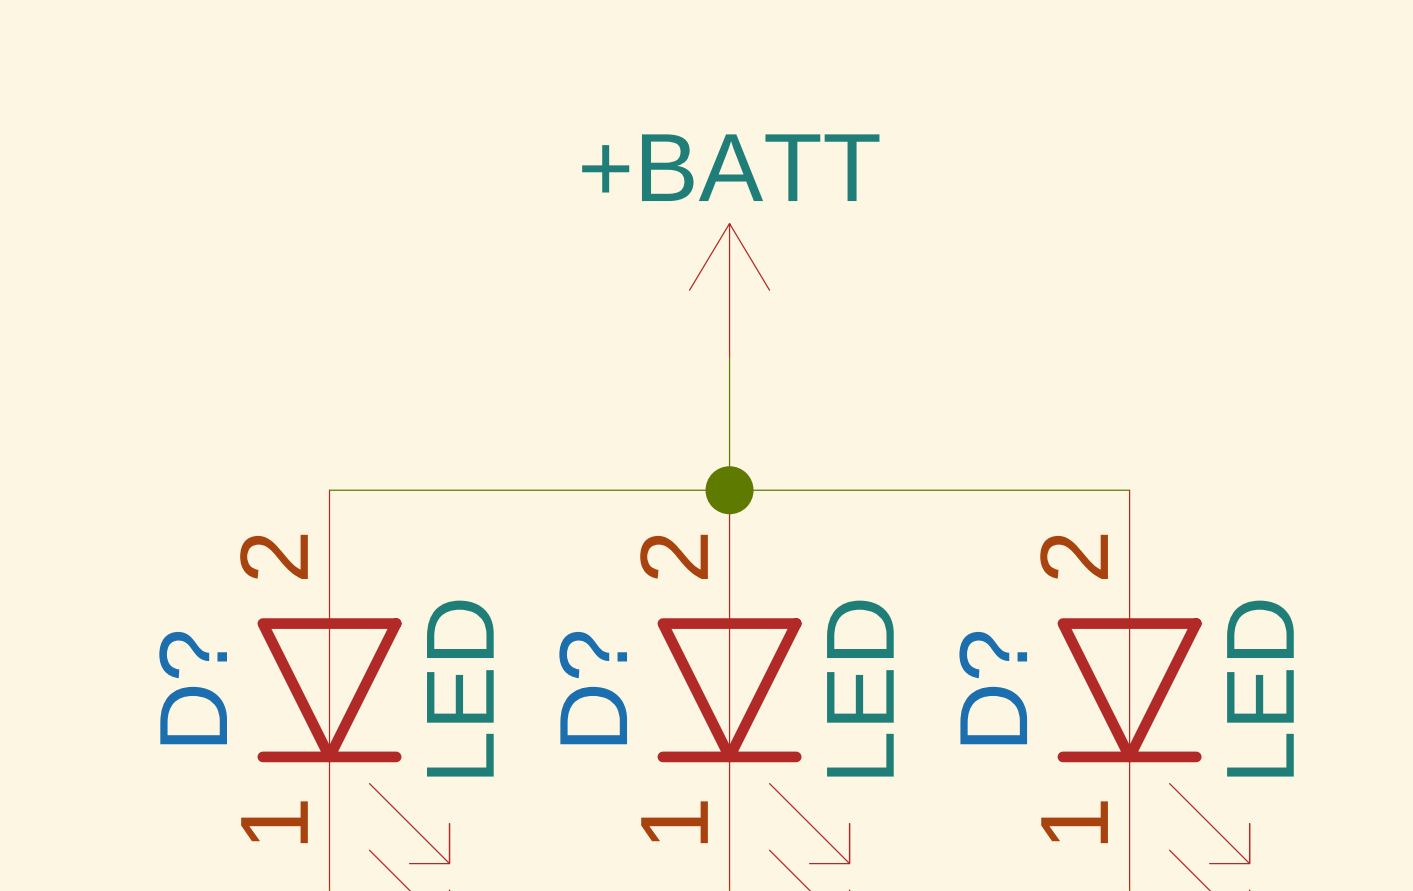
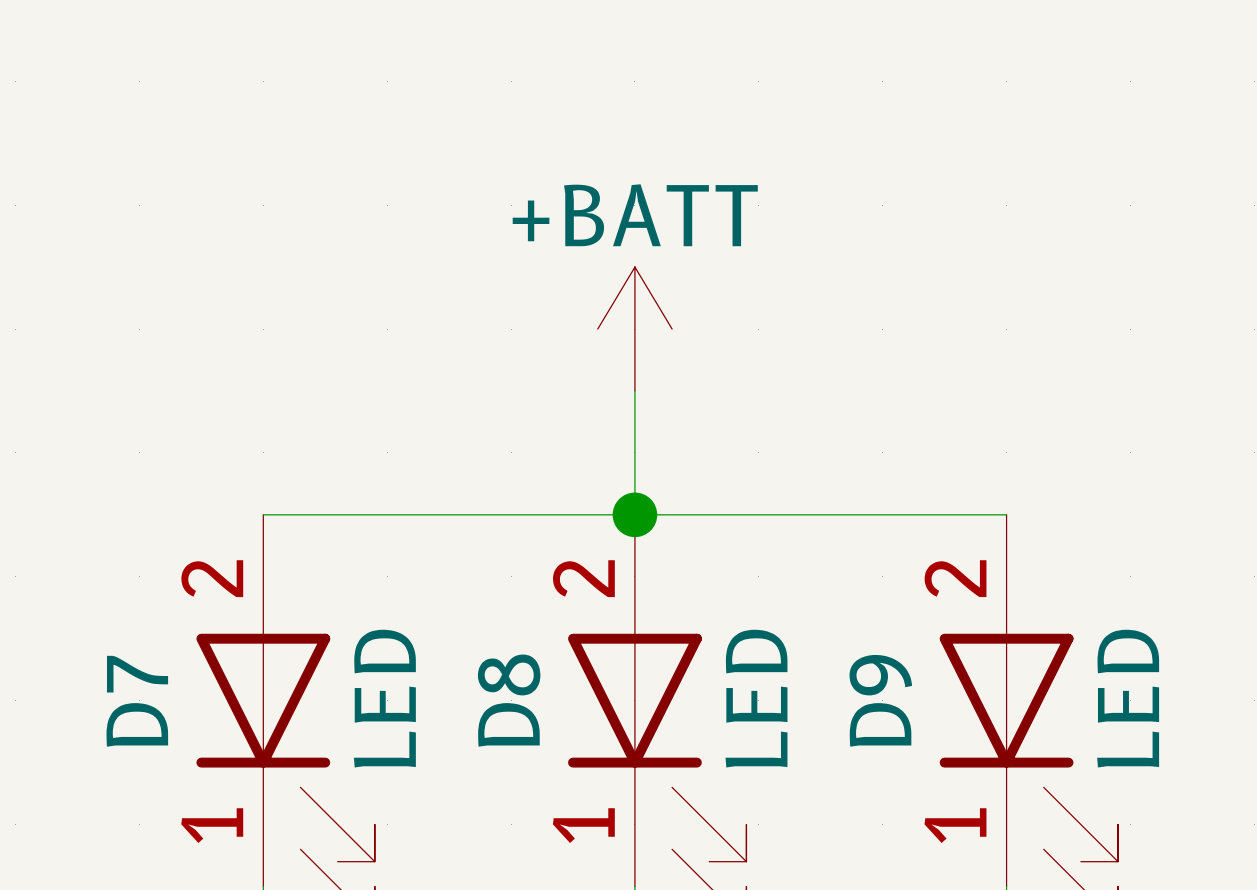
D? name: D? (193, 688) -> D7 (137, 701)
D? name: D? (593, 688) -> D8 (509, 700)
D? name: D? (993, 688) -> D9 (880, 700)

